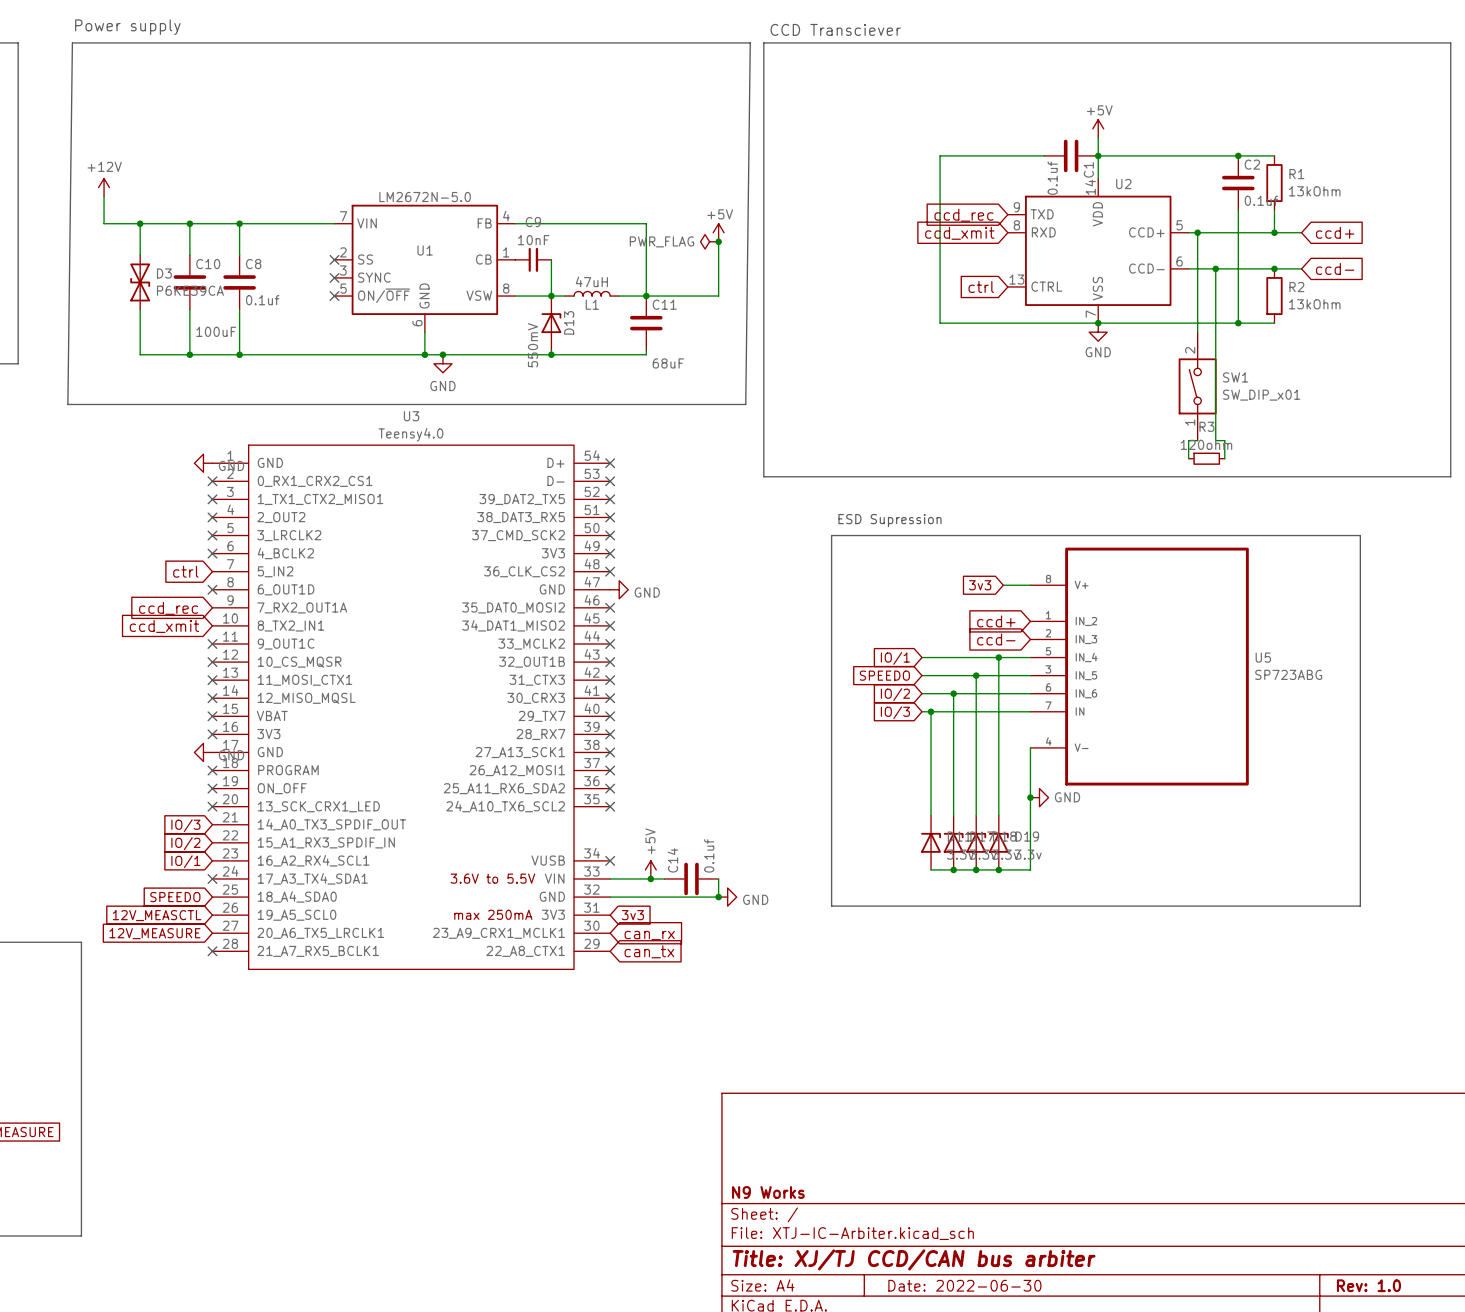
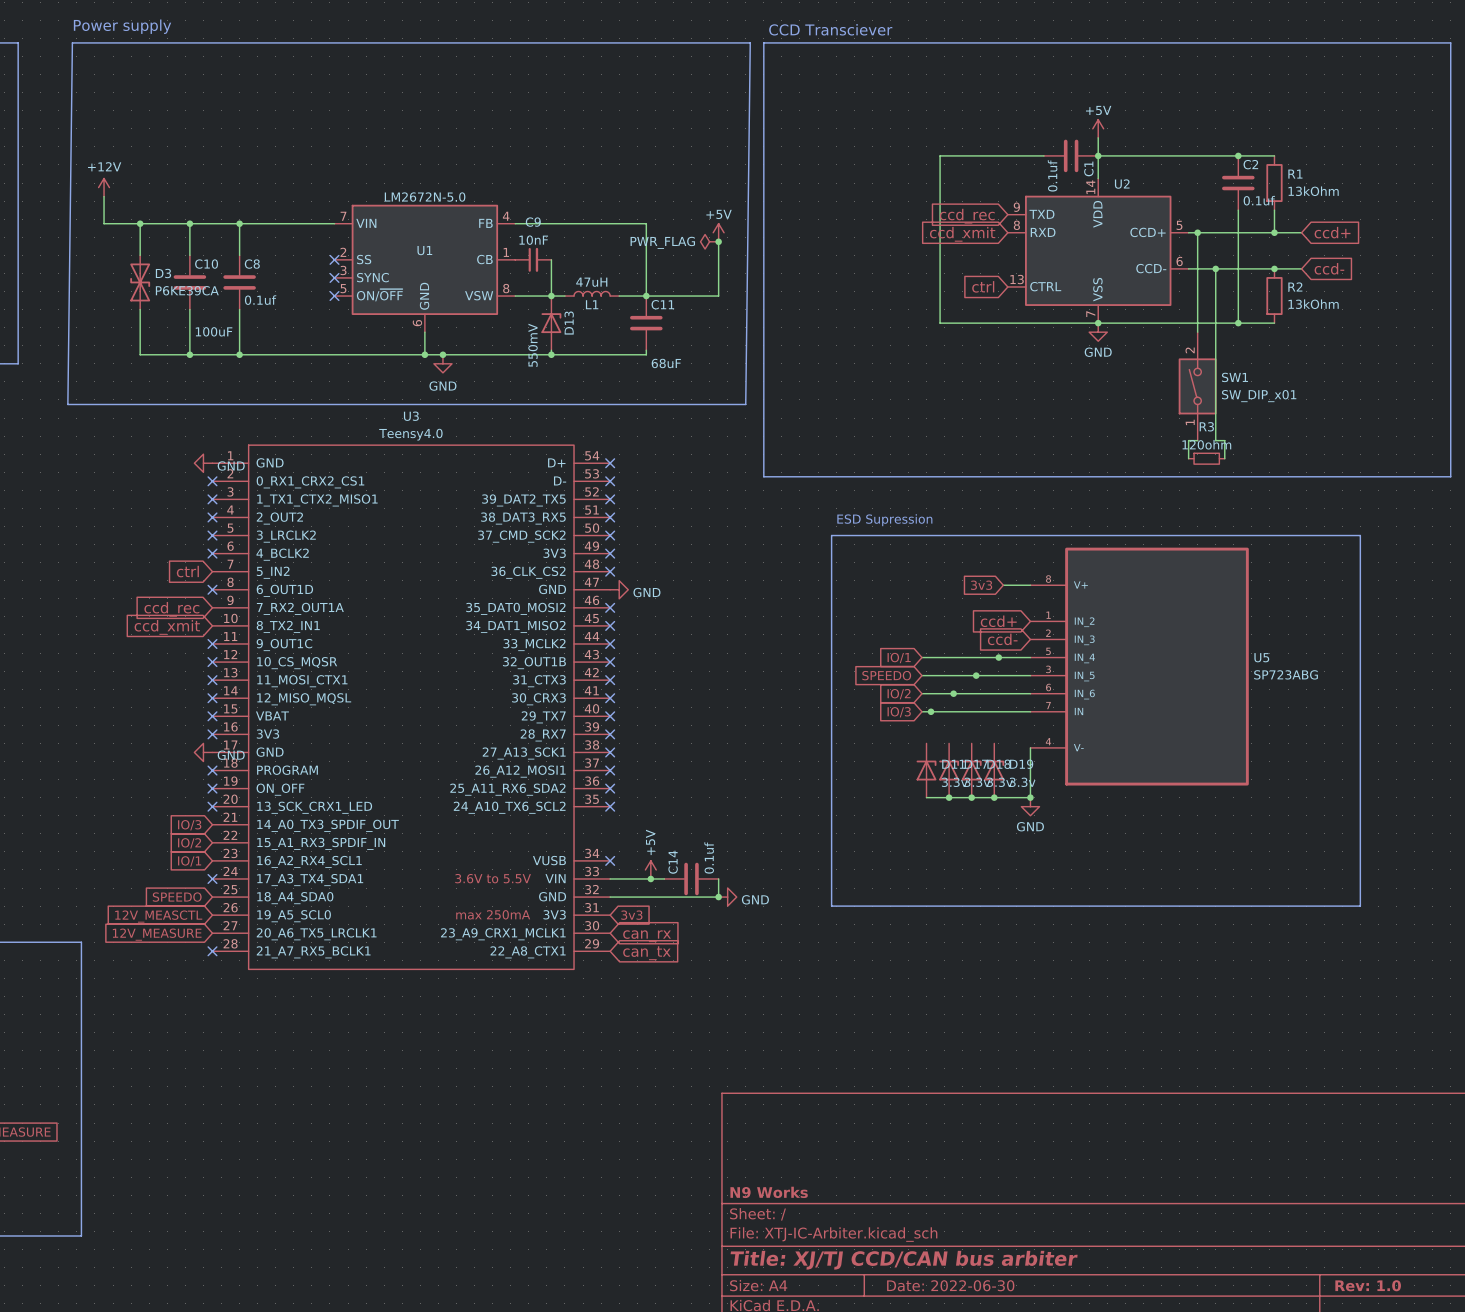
wire: (998, 657) (998, 815) -> none
wire: (976, 675) (976, 815) -> none
wire: (953, 693) (953, 815) -> none
wire: (931, 711) (931, 815) -> none
junction: none -> (949, 797)
junction: none -> (971, 797)
junction: none -> (994, 797)
wire: (1030, 797) (1030, 869) (931, 869) -> (1030, 797) (926, 797)
power symbol rotation: 0° (1039, 797) -> 90° clockwise (1030, 806)
power symbol position: GND (1039, 797) -> GND (1030, 806)
D11 position: (931, 842) -> (926, 770)
D17 position: (953, 842) -> (949, 770)
D18 position: (976, 842) -> (971, 770)
D19 position: (998, 842) -> (994, 770)
junction: (953, 869) -> none
junction: (976, 869) -> none
junction: (998, 869) -> none

